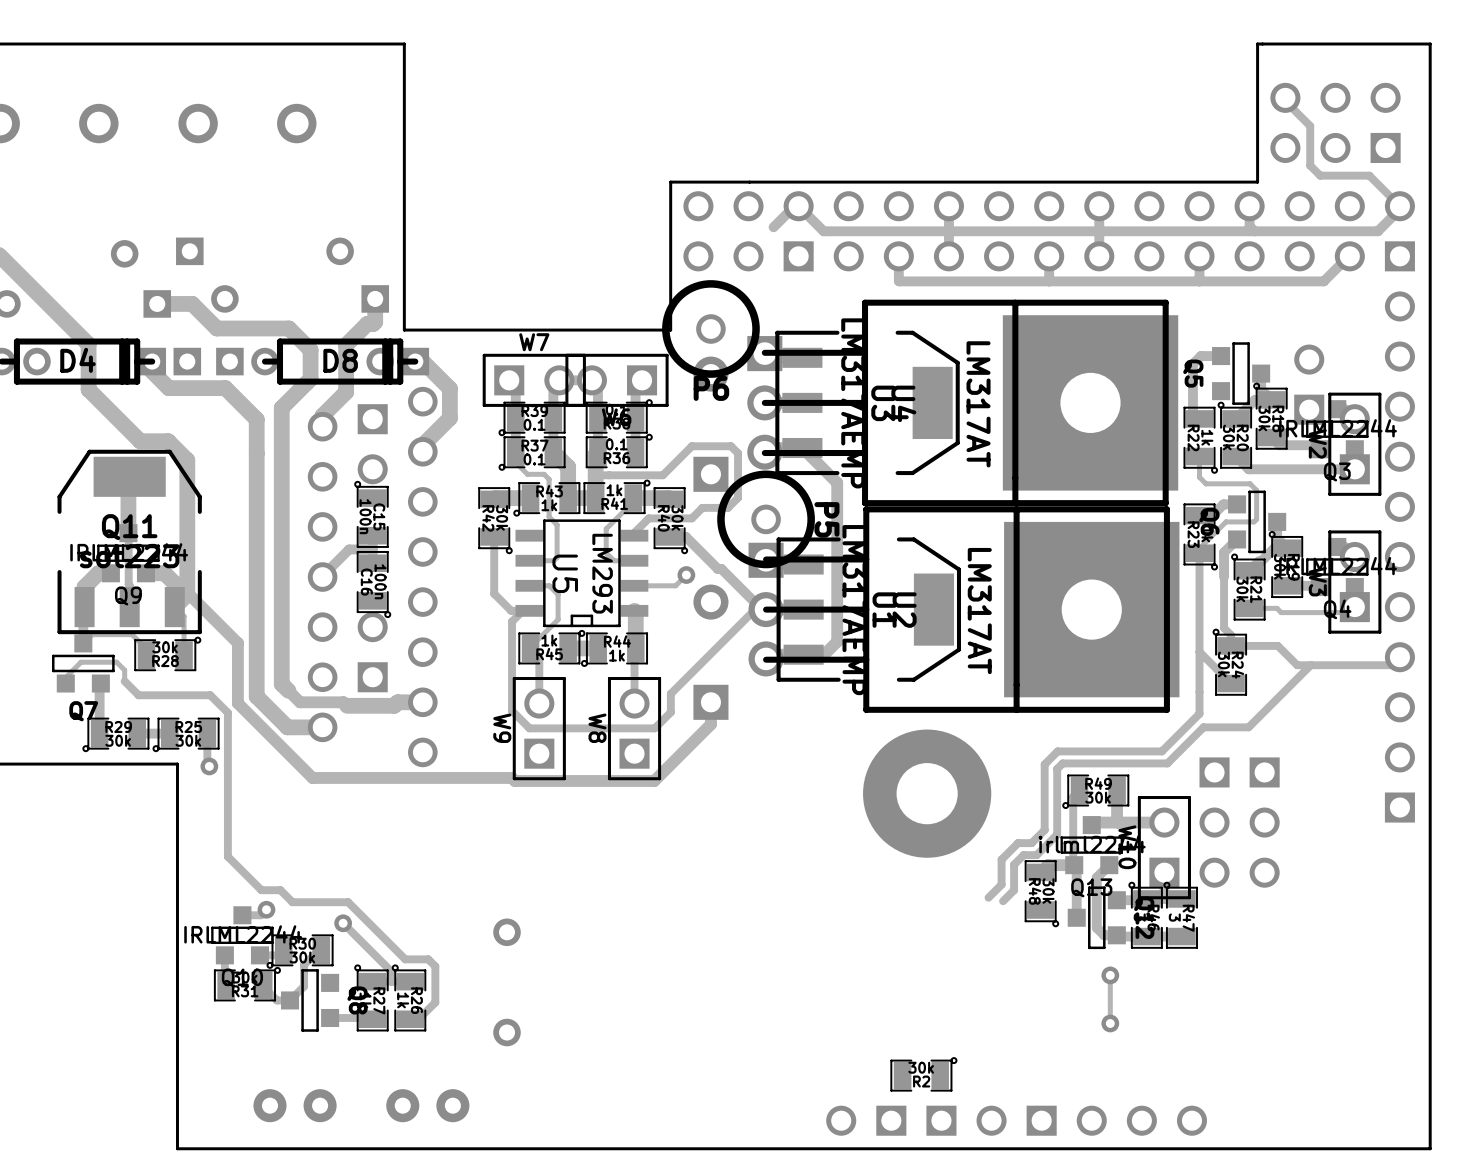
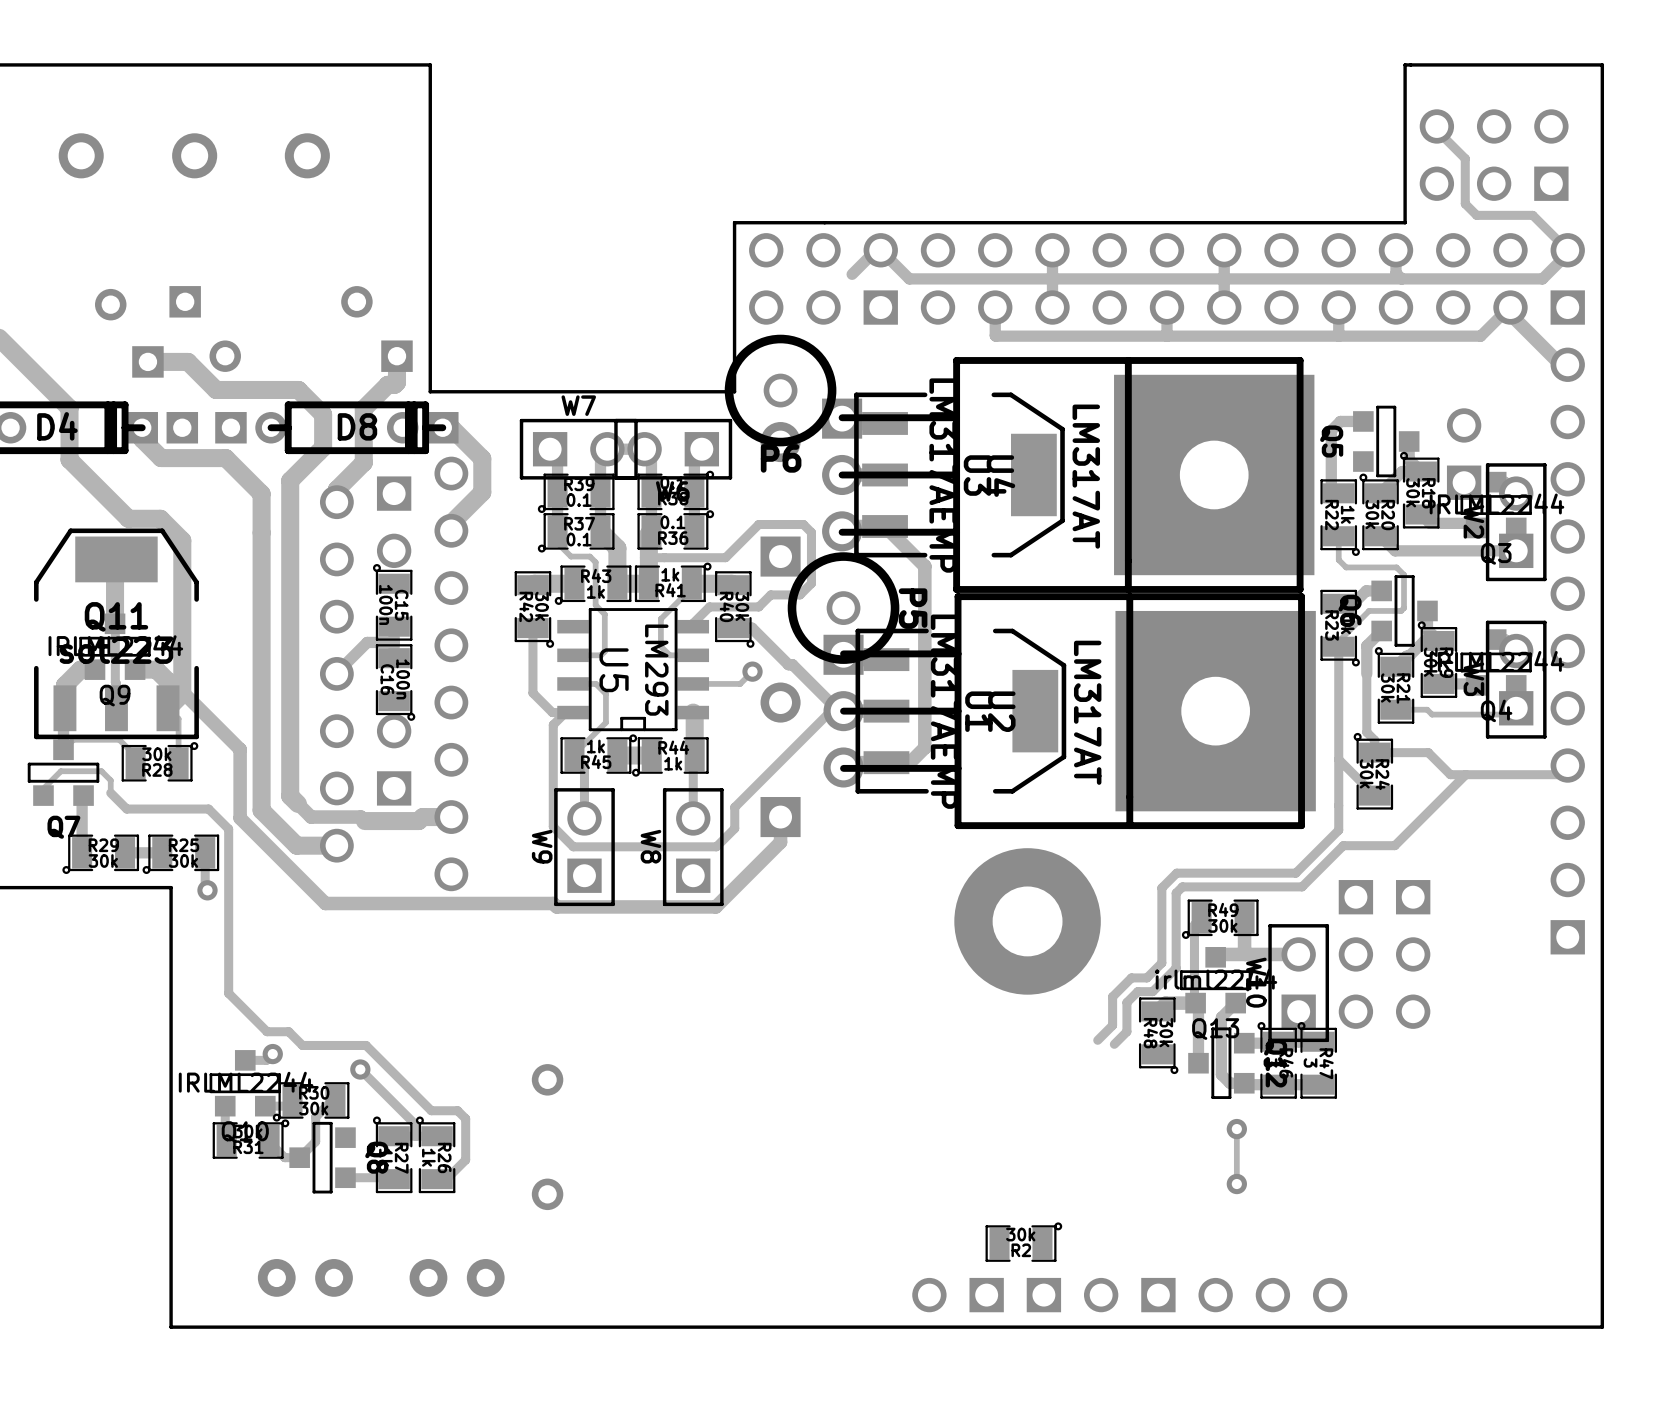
track: none -> (1510, 307) (1510, 314) (1560, 364) (1567, 364)

